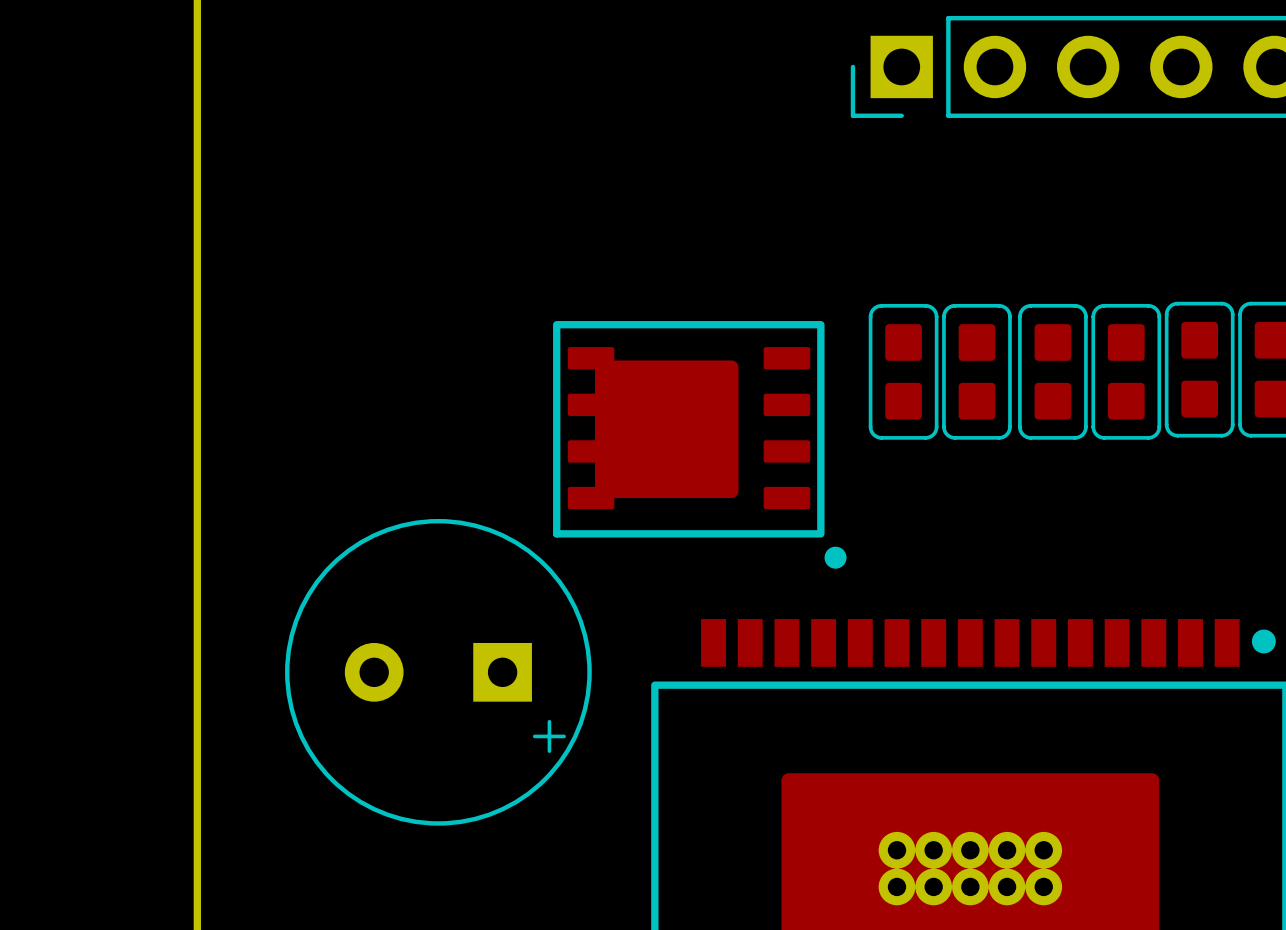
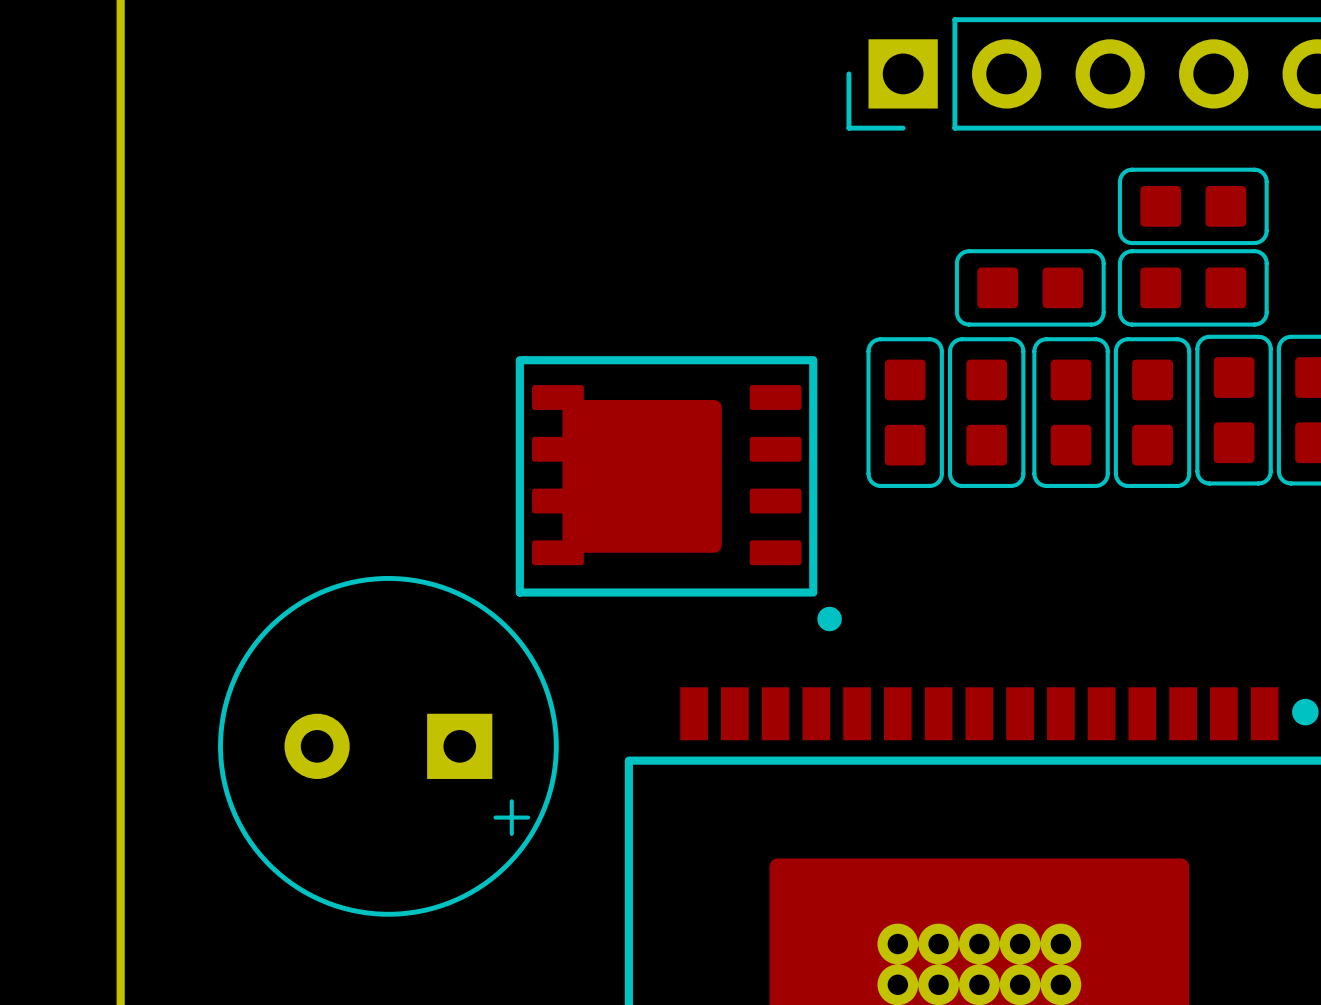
part: none -> (1193, 206)
part: none -> (1030, 287)
part: none -> (1193, 287)

